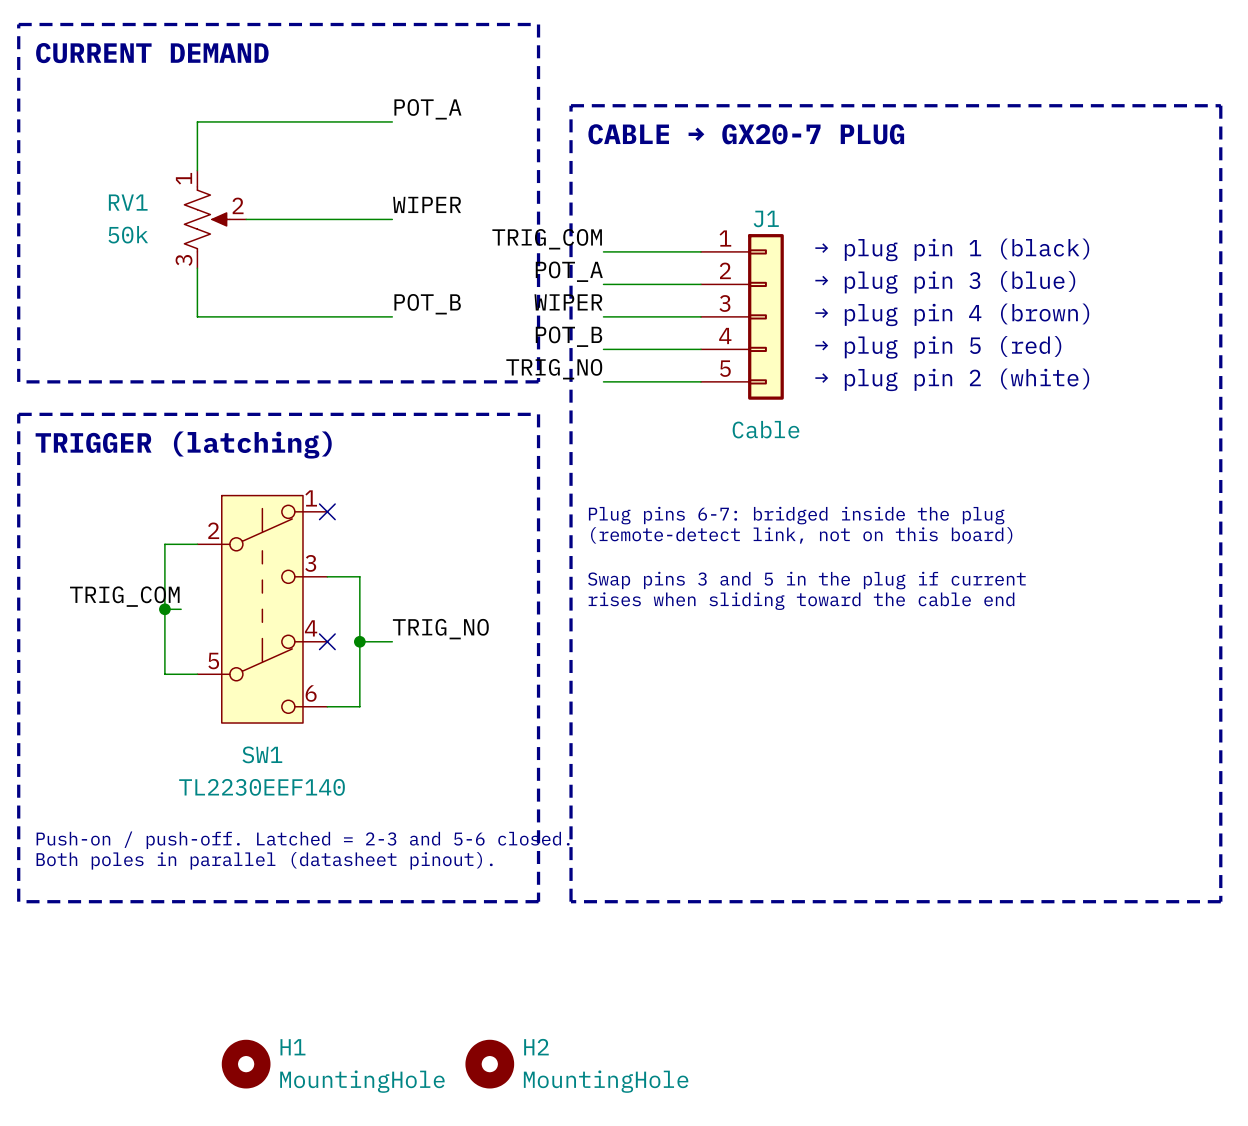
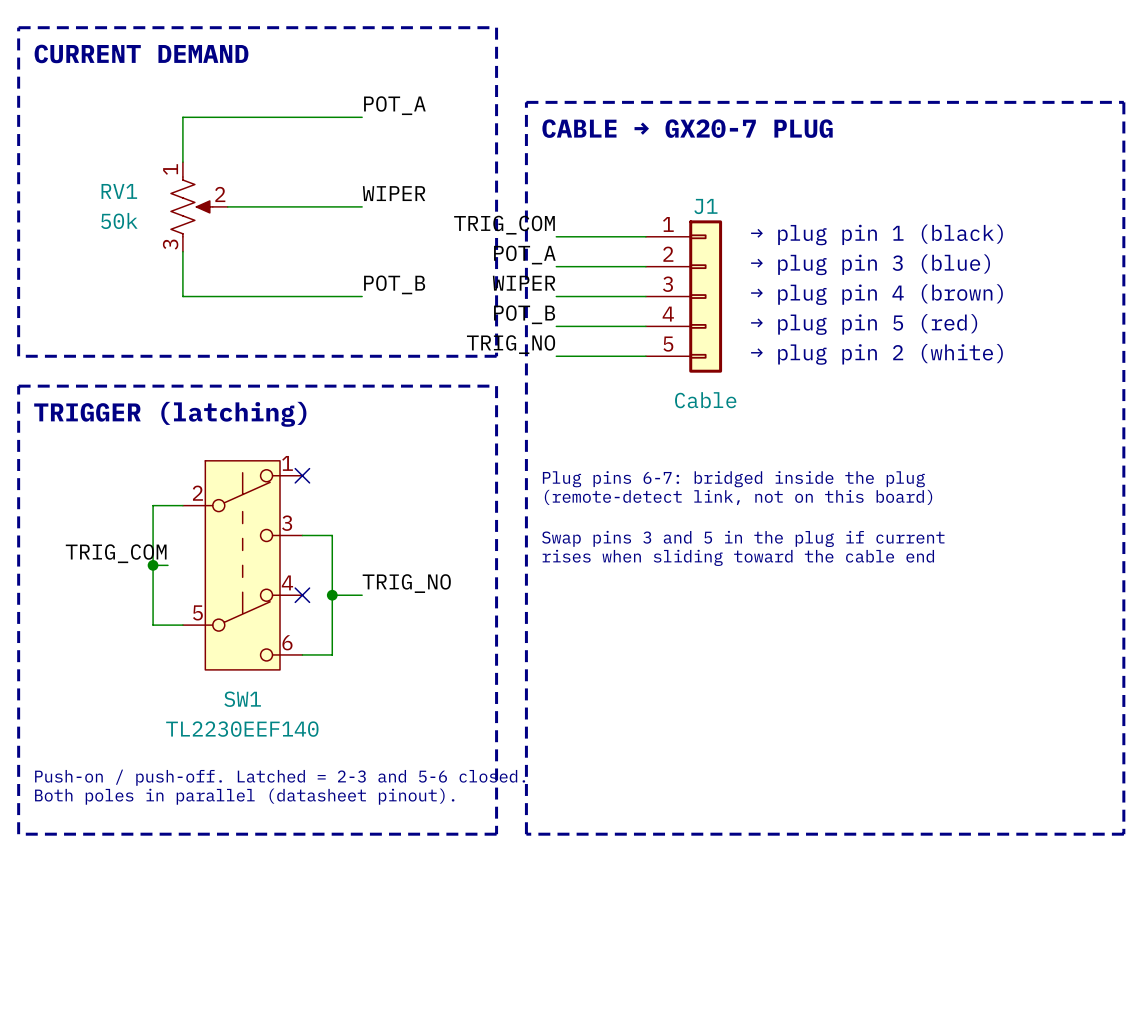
H1: MountingHole (246, 1064) -> none
H2: MountingHole (489, 1064) -> none

